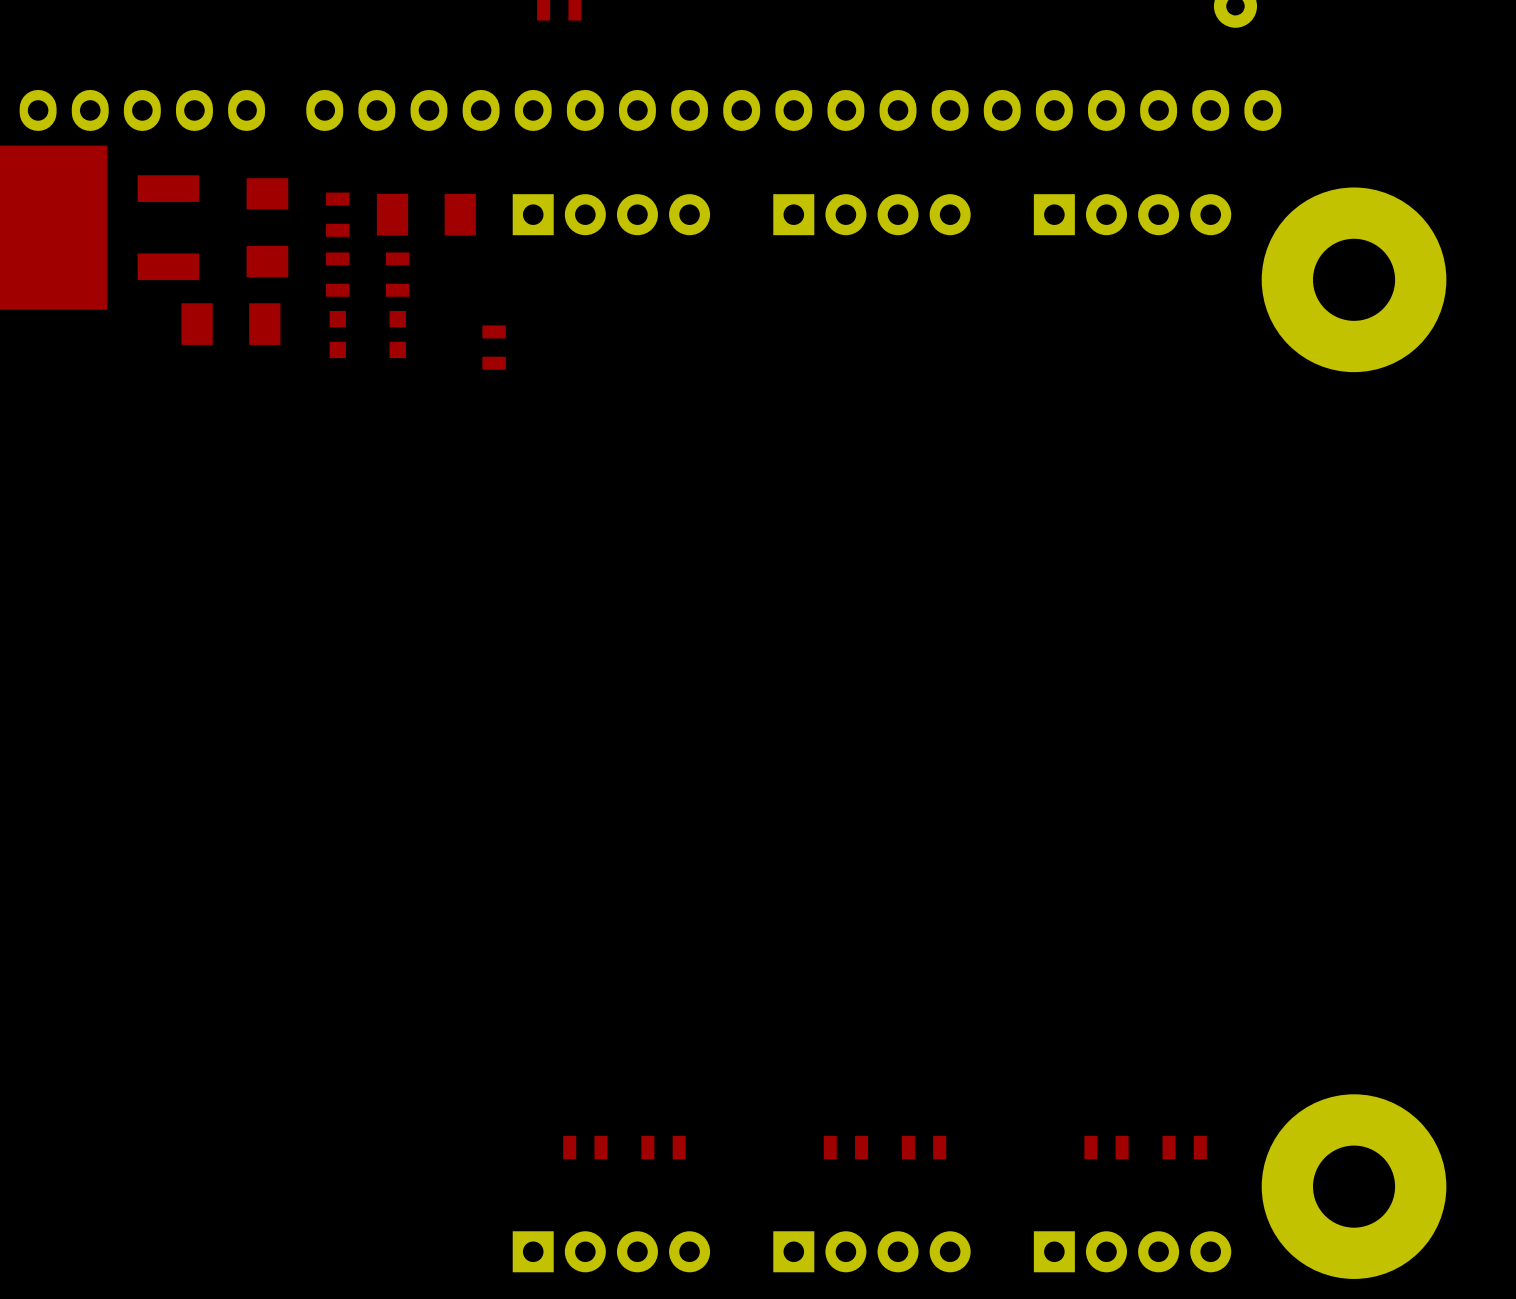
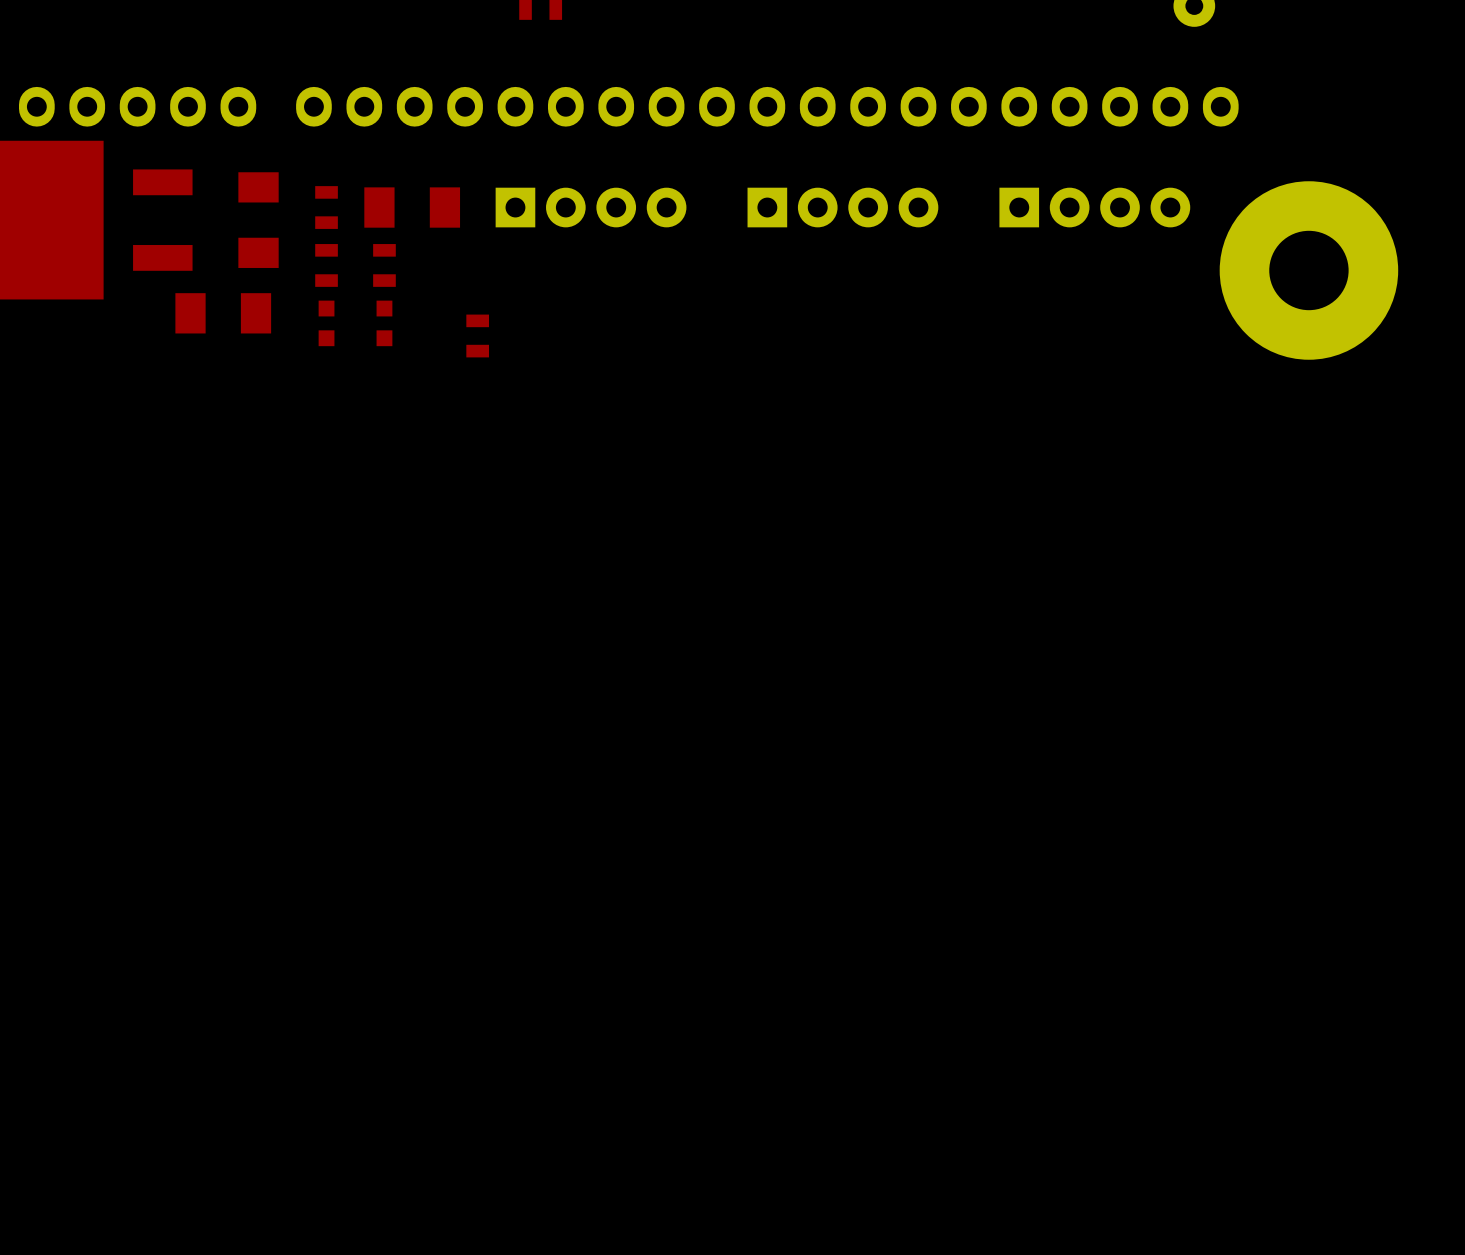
part: (585, 1147) -> none
part: (663, 1147) -> none
part: (845, 1147) -> none
part: (924, 1147) -> none
part: (1106, 1147) -> none
part: (1184, 1147) -> none
part: (1354, 1186) -> none
part: (611, 1251) -> none
part: (871, 1251) -> none
part: (1132, 1251) -> none

